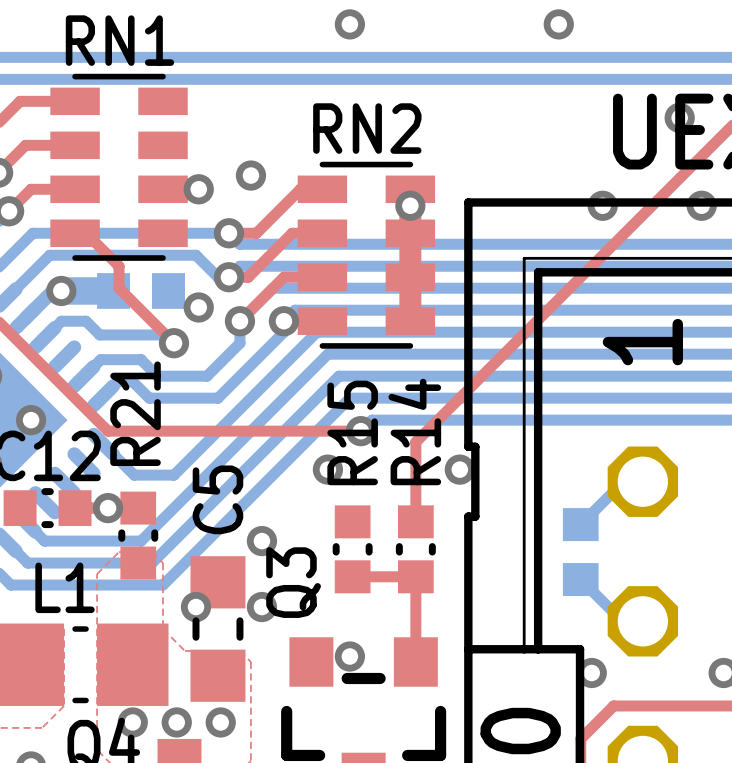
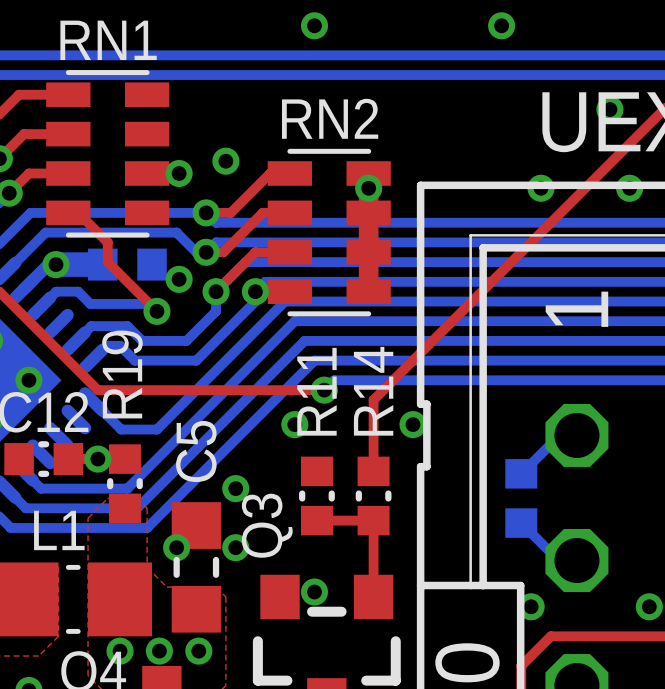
R21 name: R21 (135, 413) -> R19 (122, 374)
R15 name: R15 (352, 432) -> R11 (316, 391)

